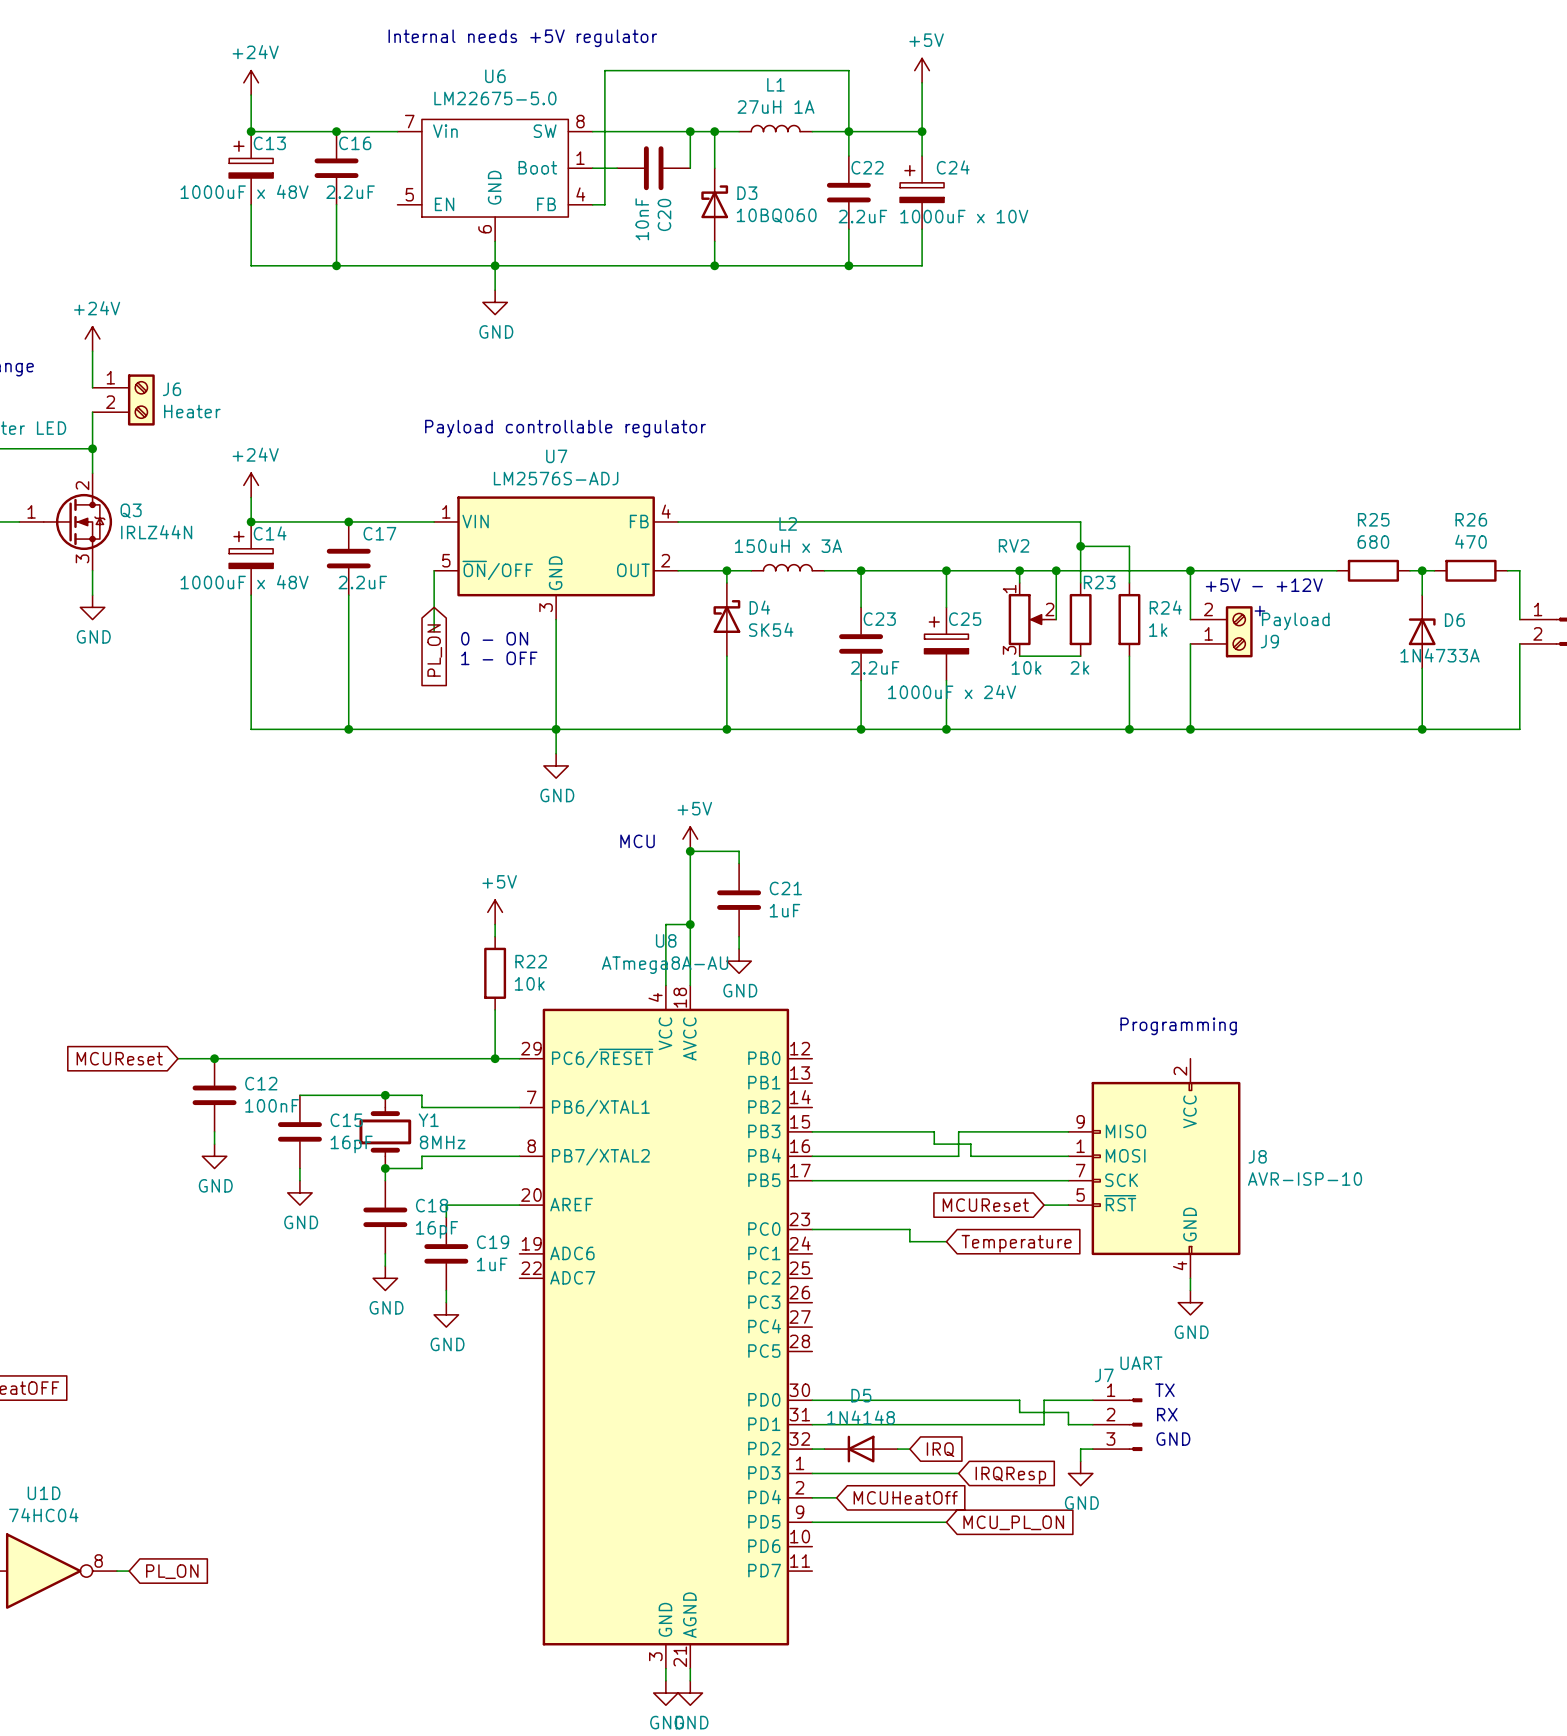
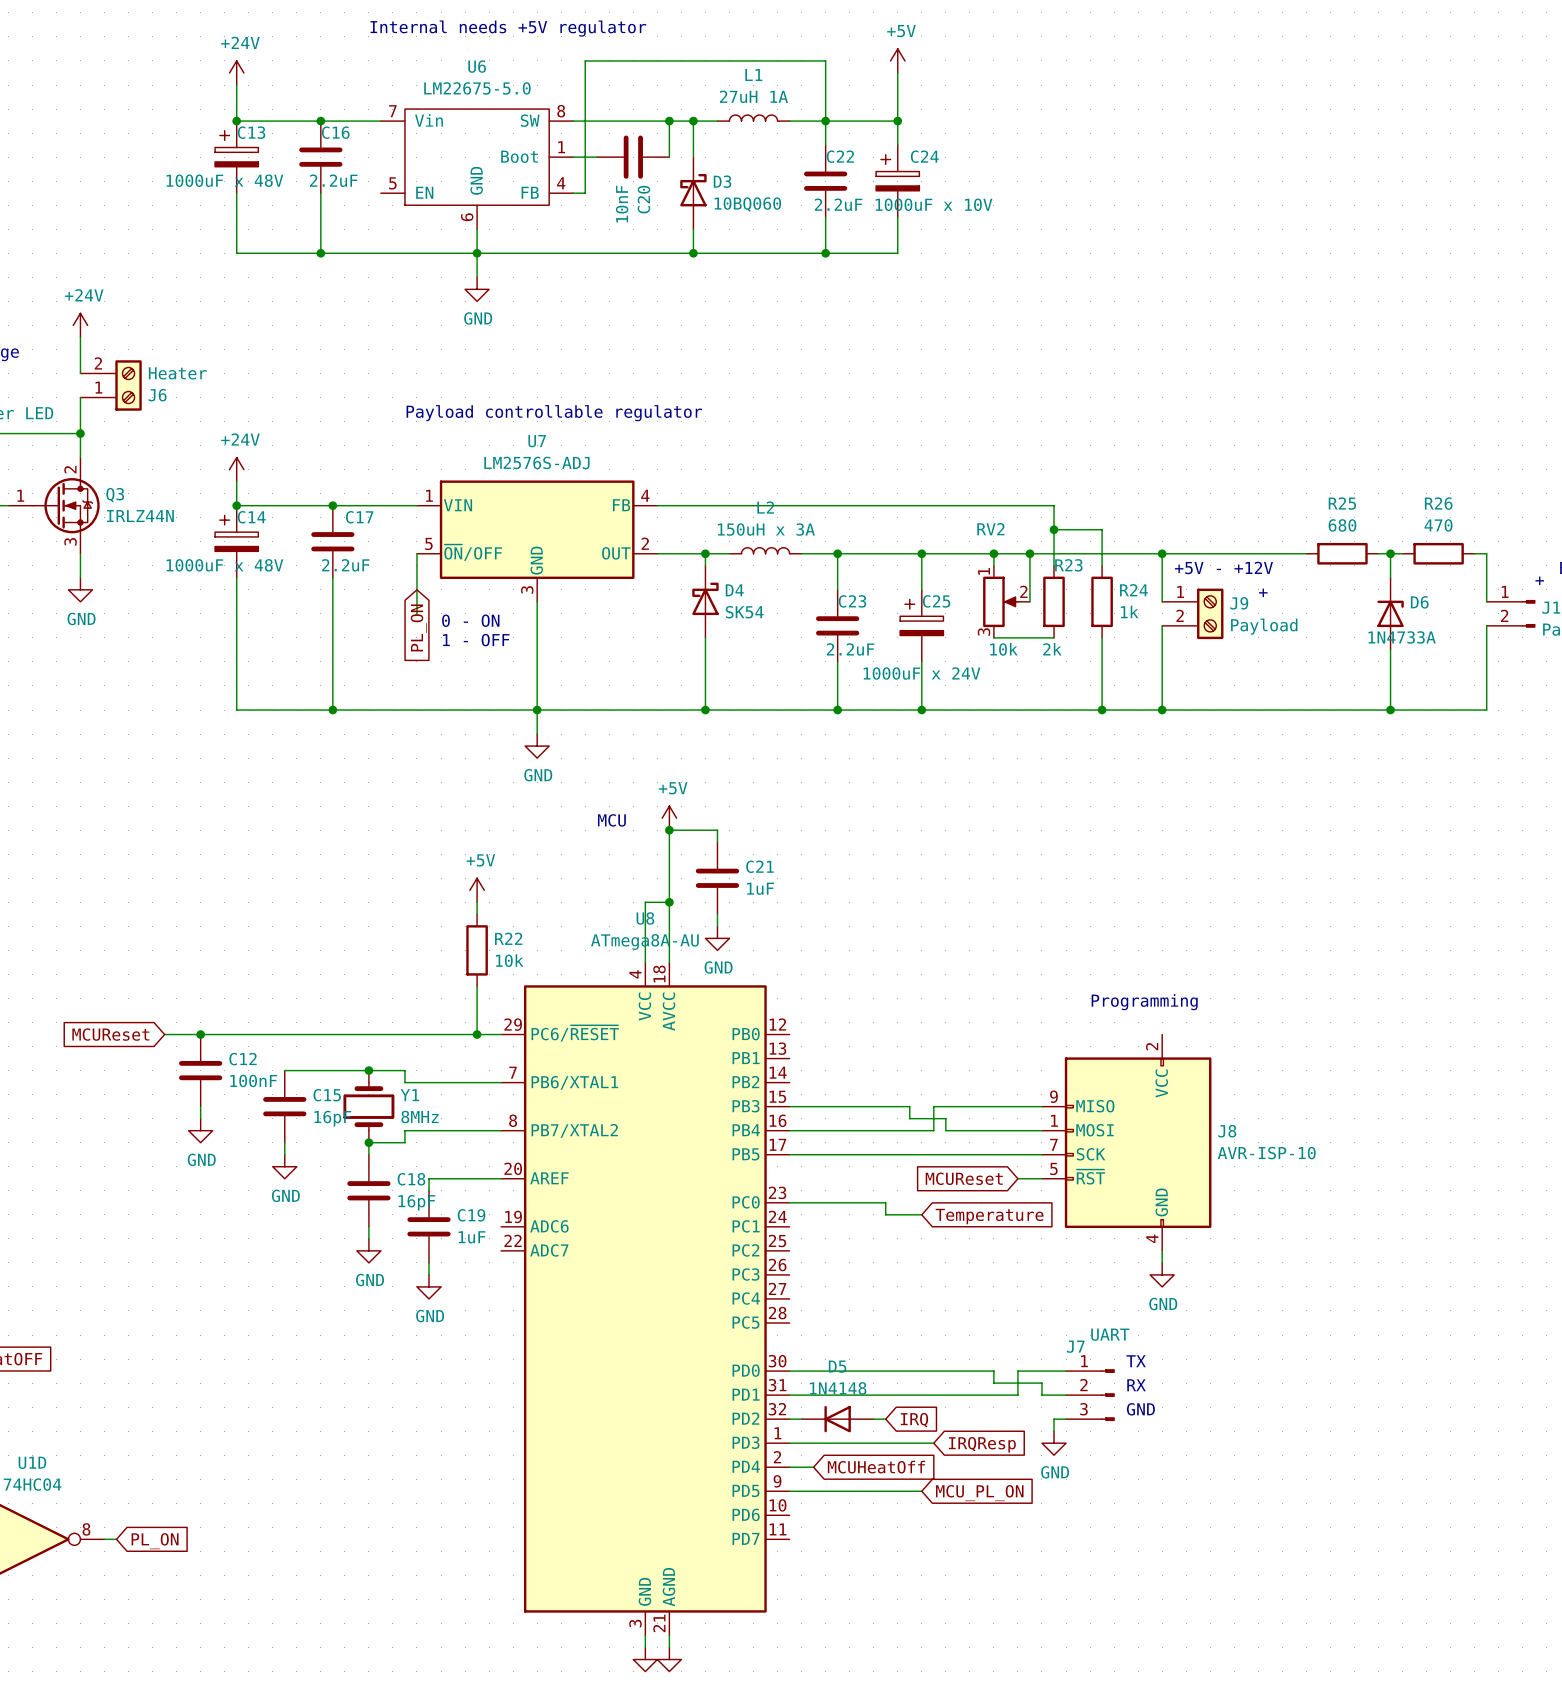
J6 flip: as is (141, 399) -> up-down (128, 385)
text position: + (1259, 611) -> + (1263, 592)
J9 flip: as is (1239, 631) -> up-down (1210, 613)

